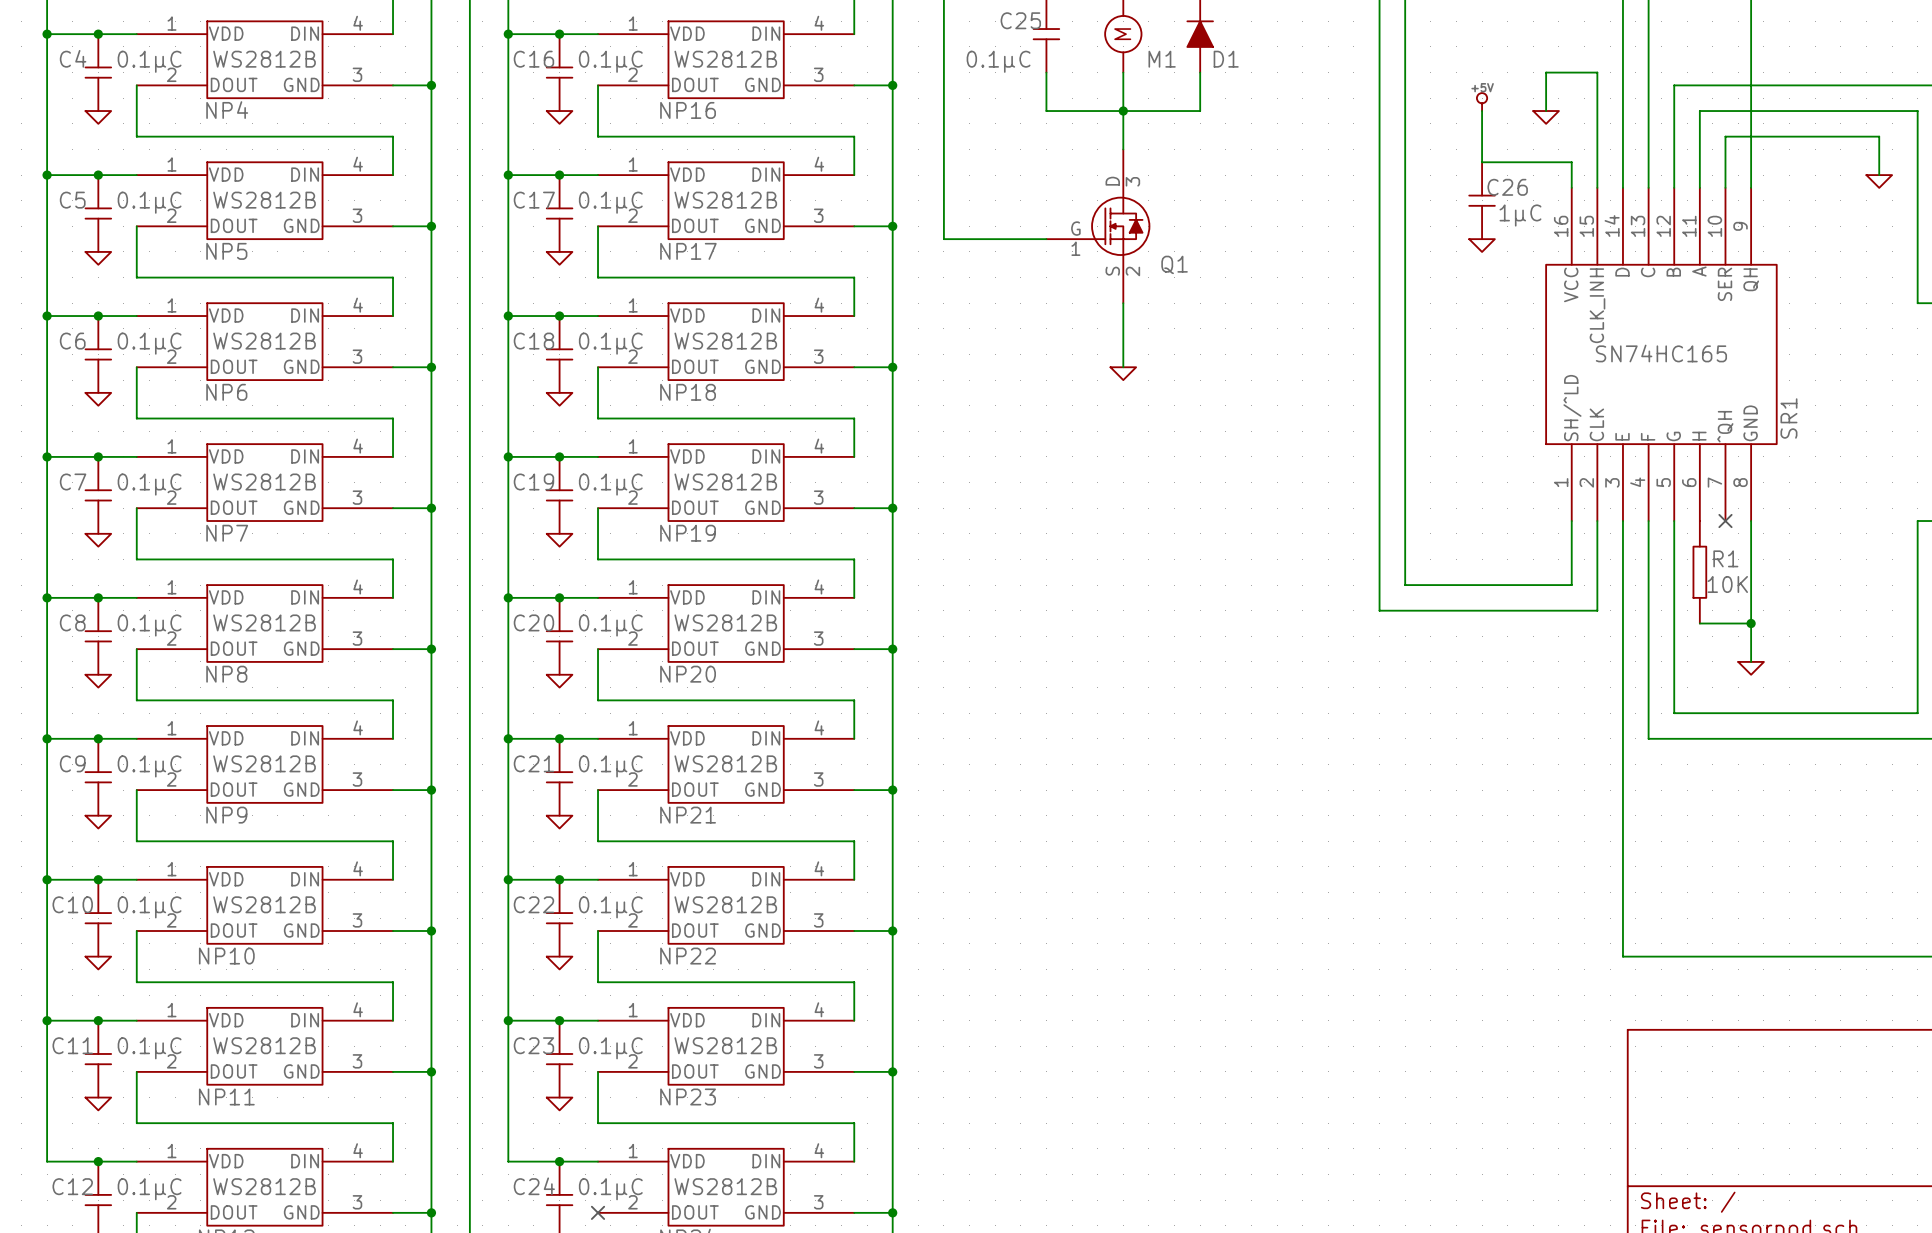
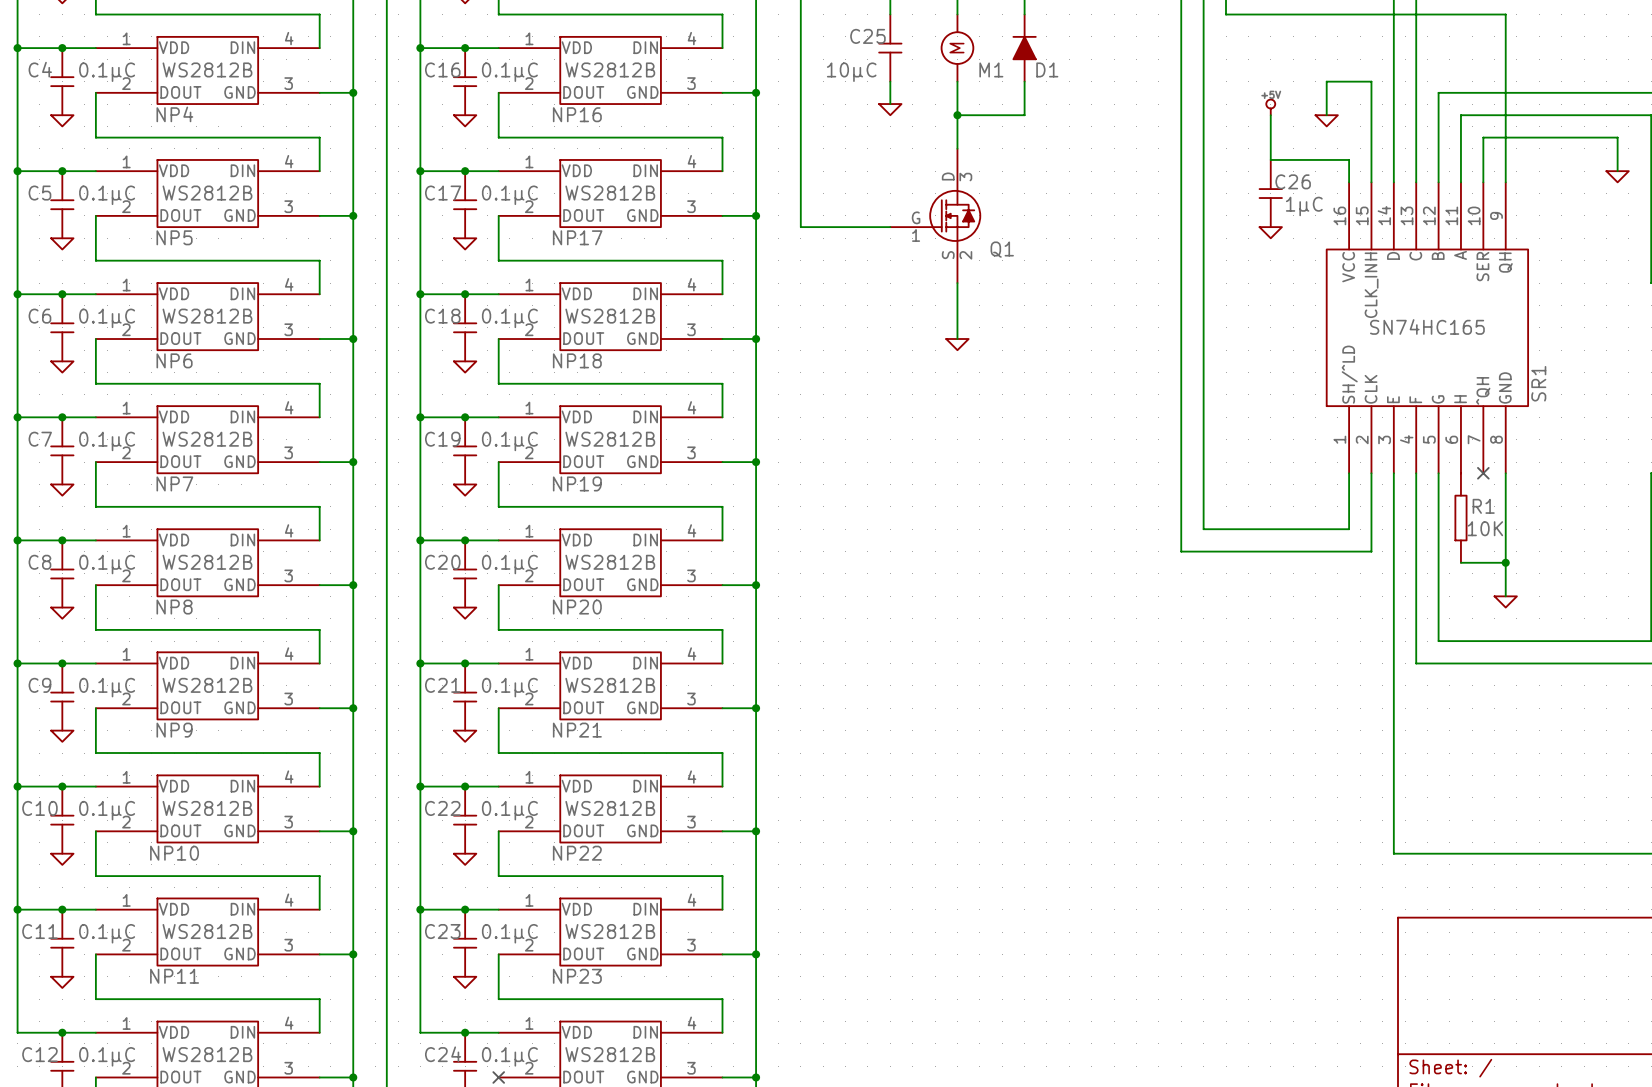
C25 text: 0.1µC (998, 61) -> 10µC (851, 72)
wire: (1046, 98) (1046, 111) (1123, 111) -> none
power symbol: none -> (890, 109)

